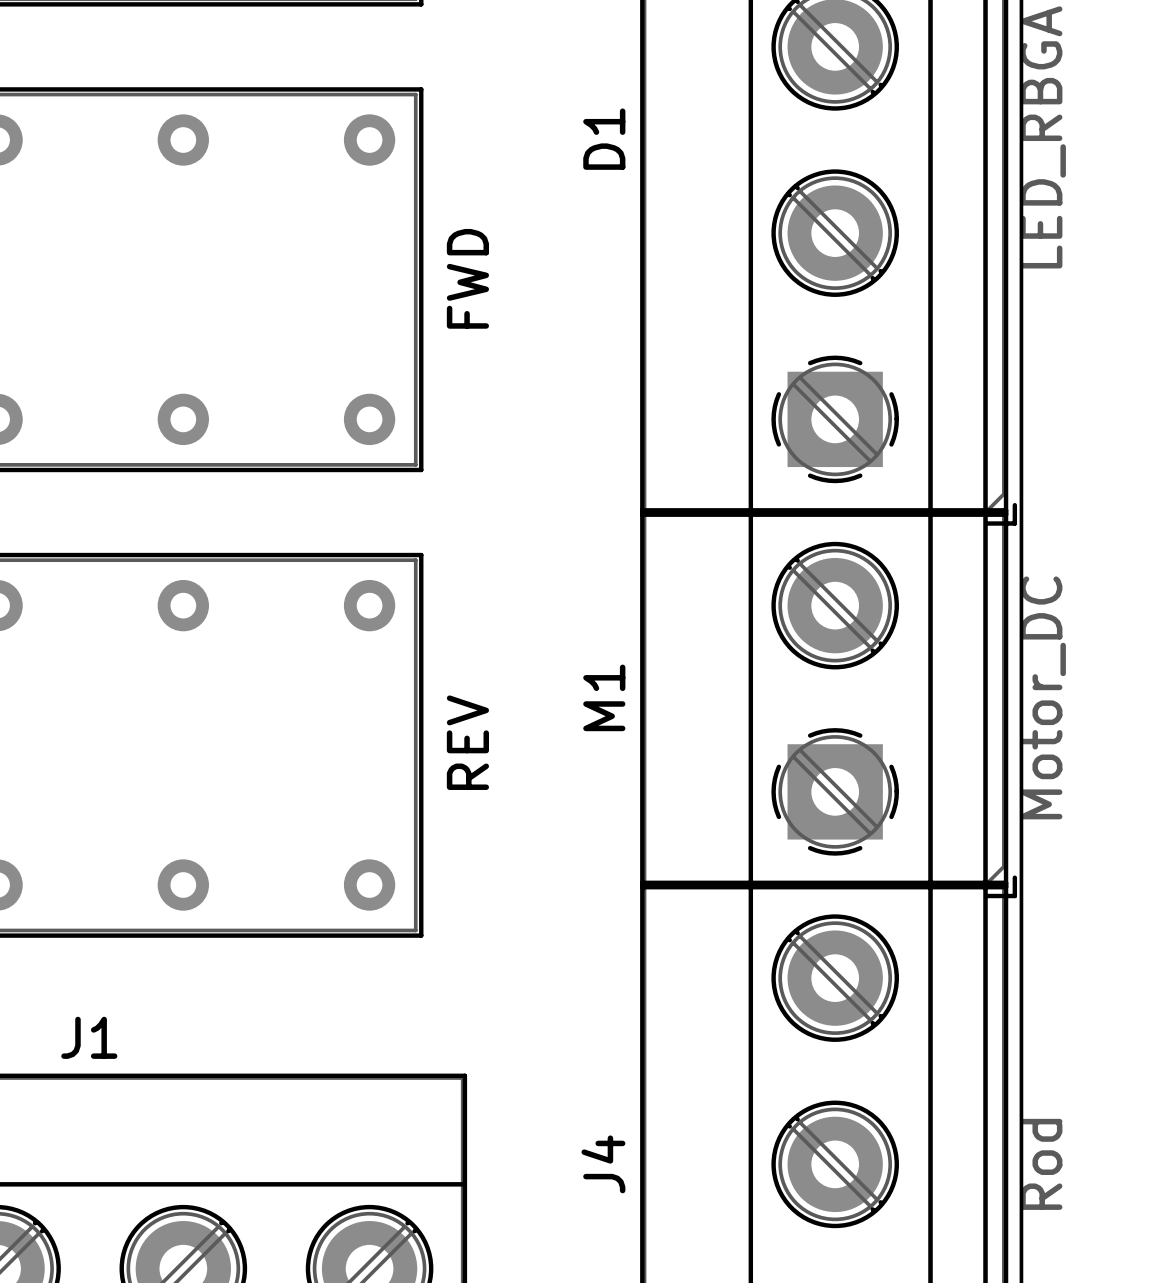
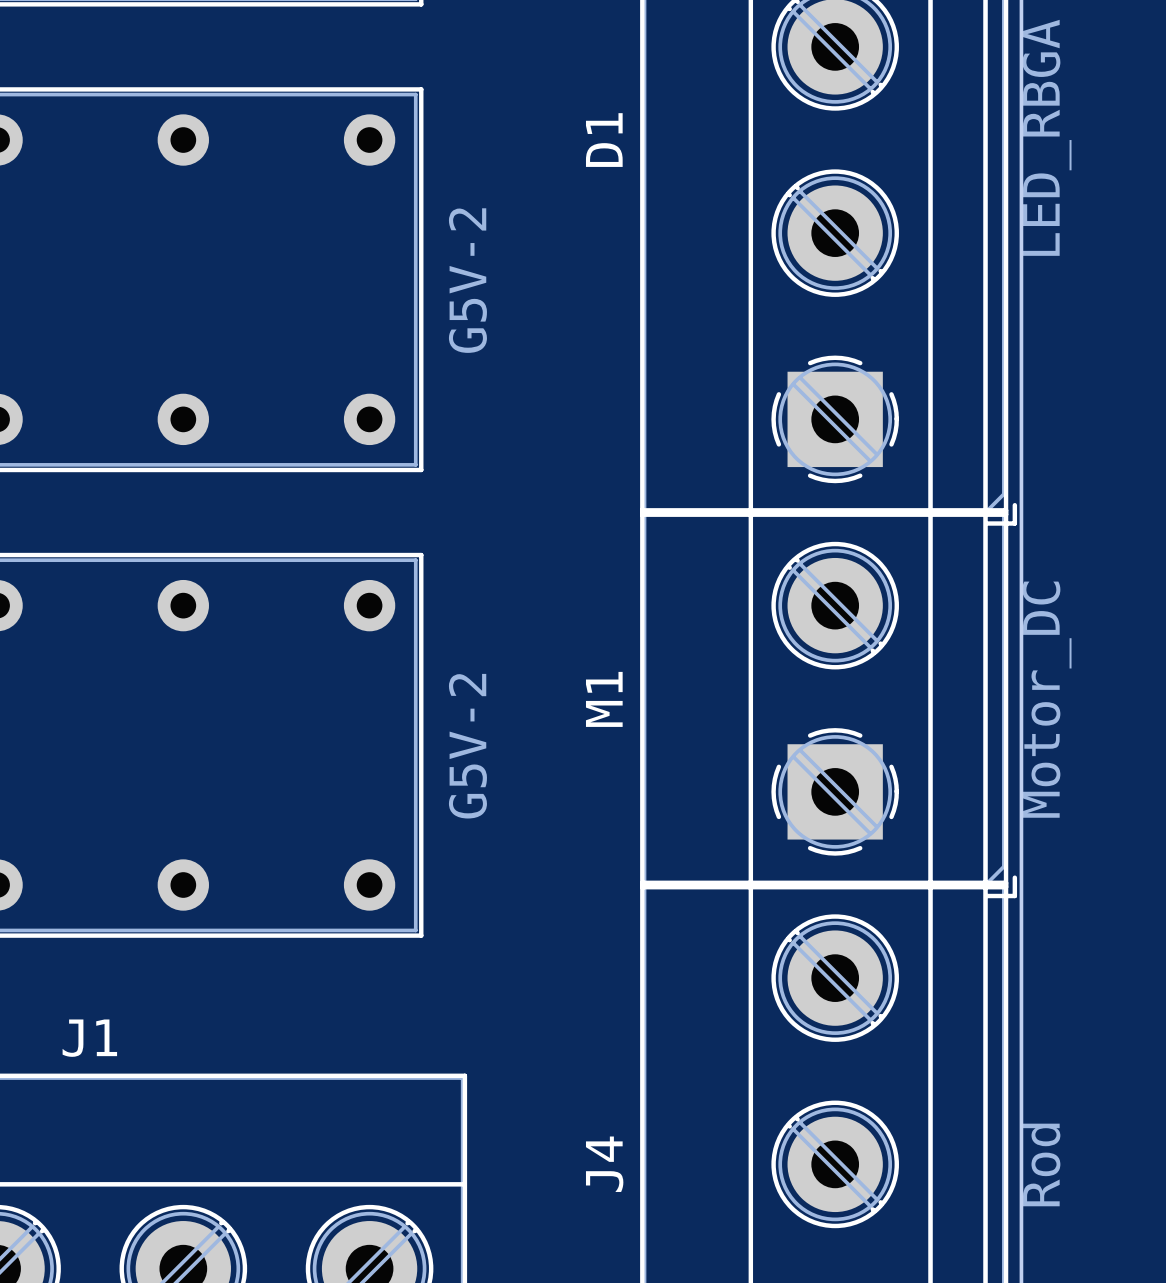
part value: FWD (467, 278) -> G5V-2 (467, 280)
part value: REV (467, 742) -> G5V-2 (467, 746)

